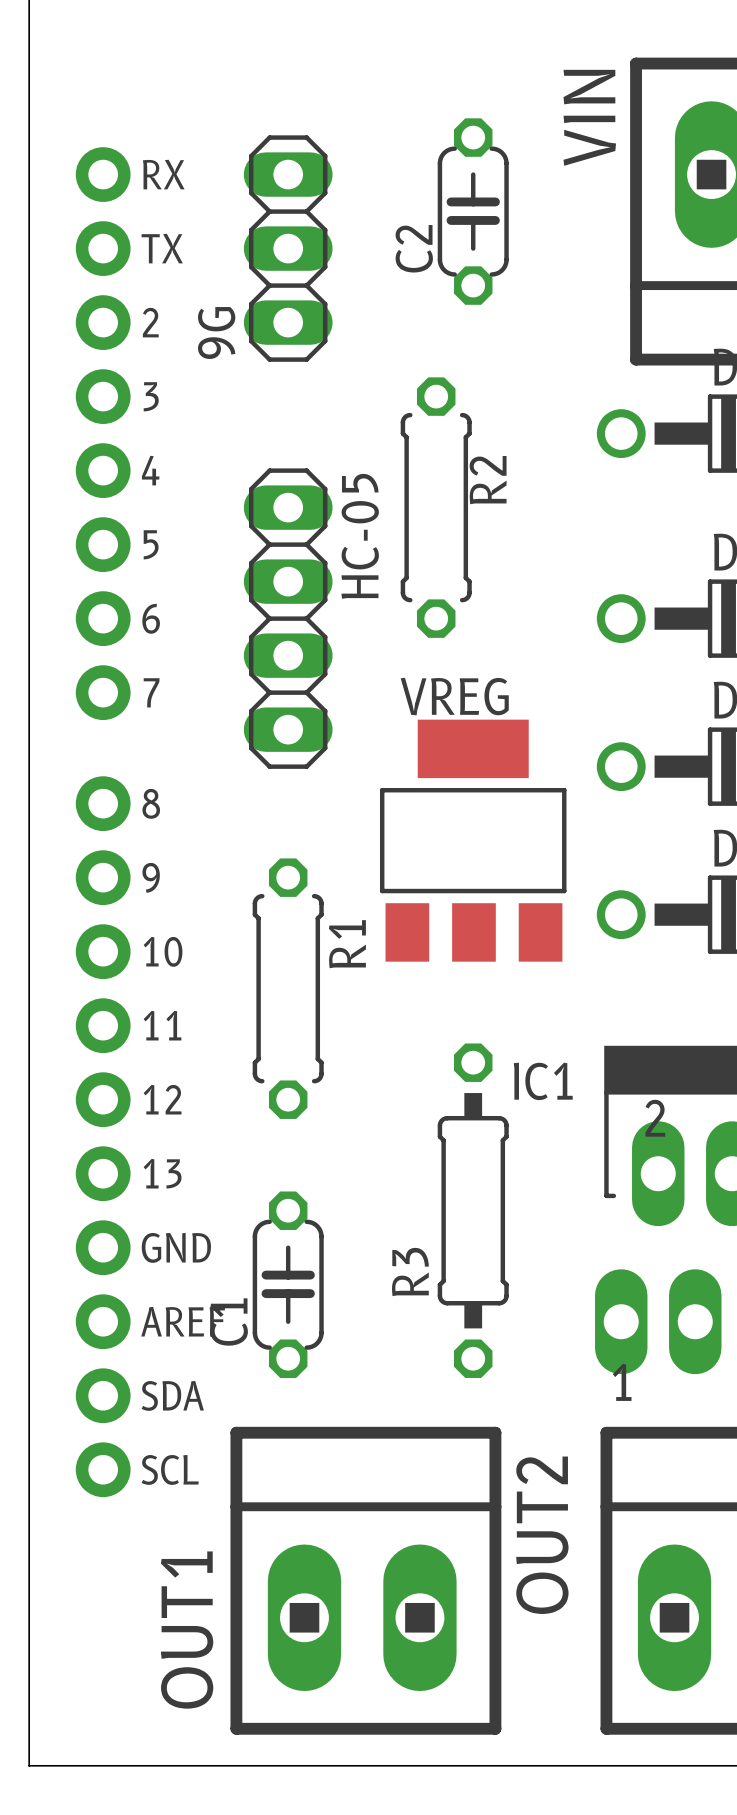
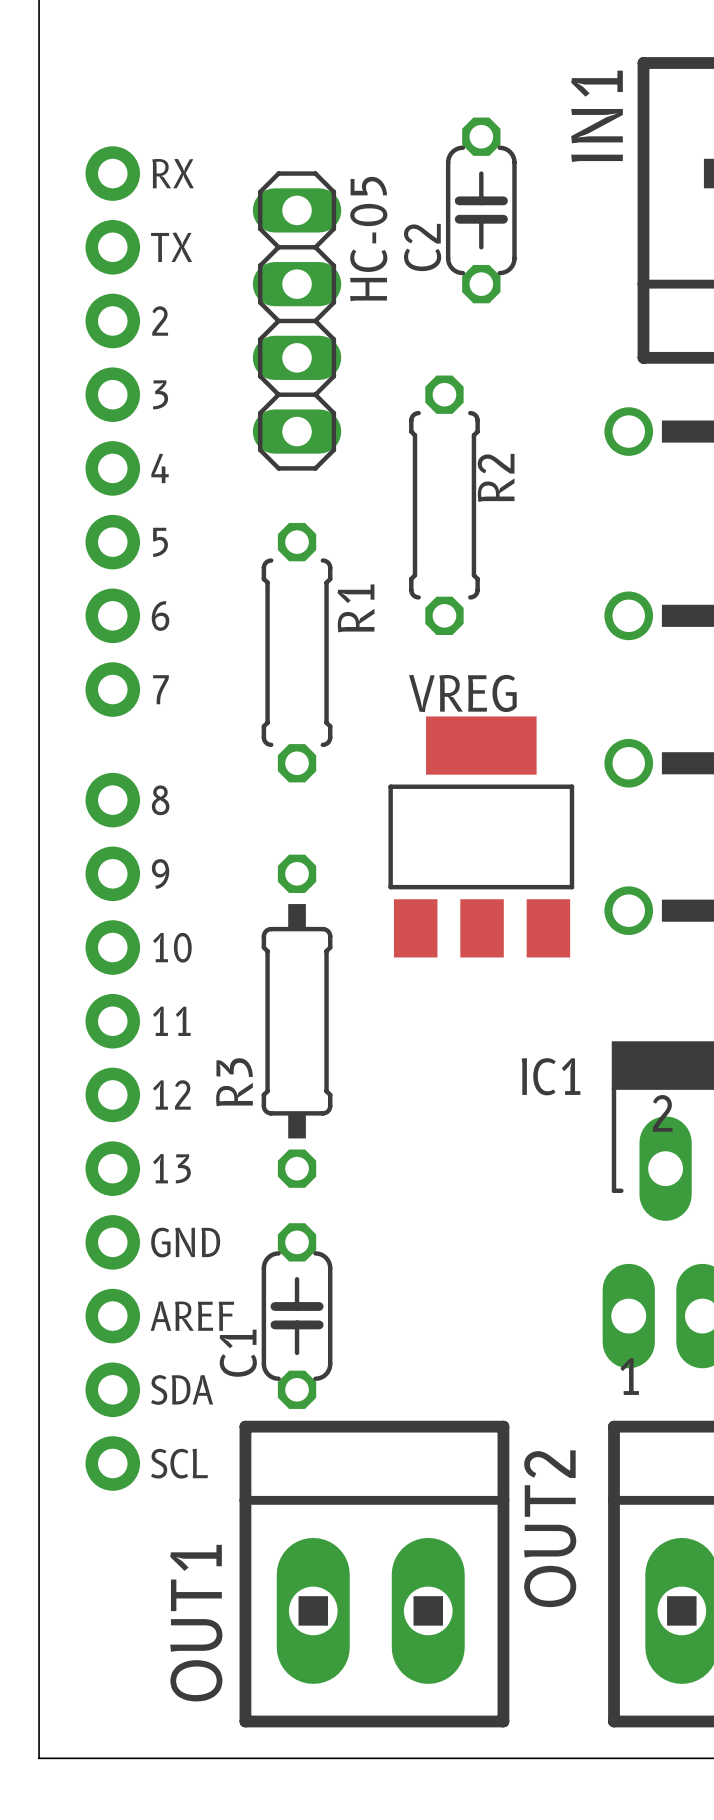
VIN name: VIN (589, 117) -> IN1 (597, 116)
9G: (288, 248) -> none
HC-05 position: (288, 618) -> (297, 320)
R1 position: (288, 988) -> (297, 652)
R3 position: (473, 1210) -> (297, 1021)
C1 position: (288, 1284) -> (297, 1316)

